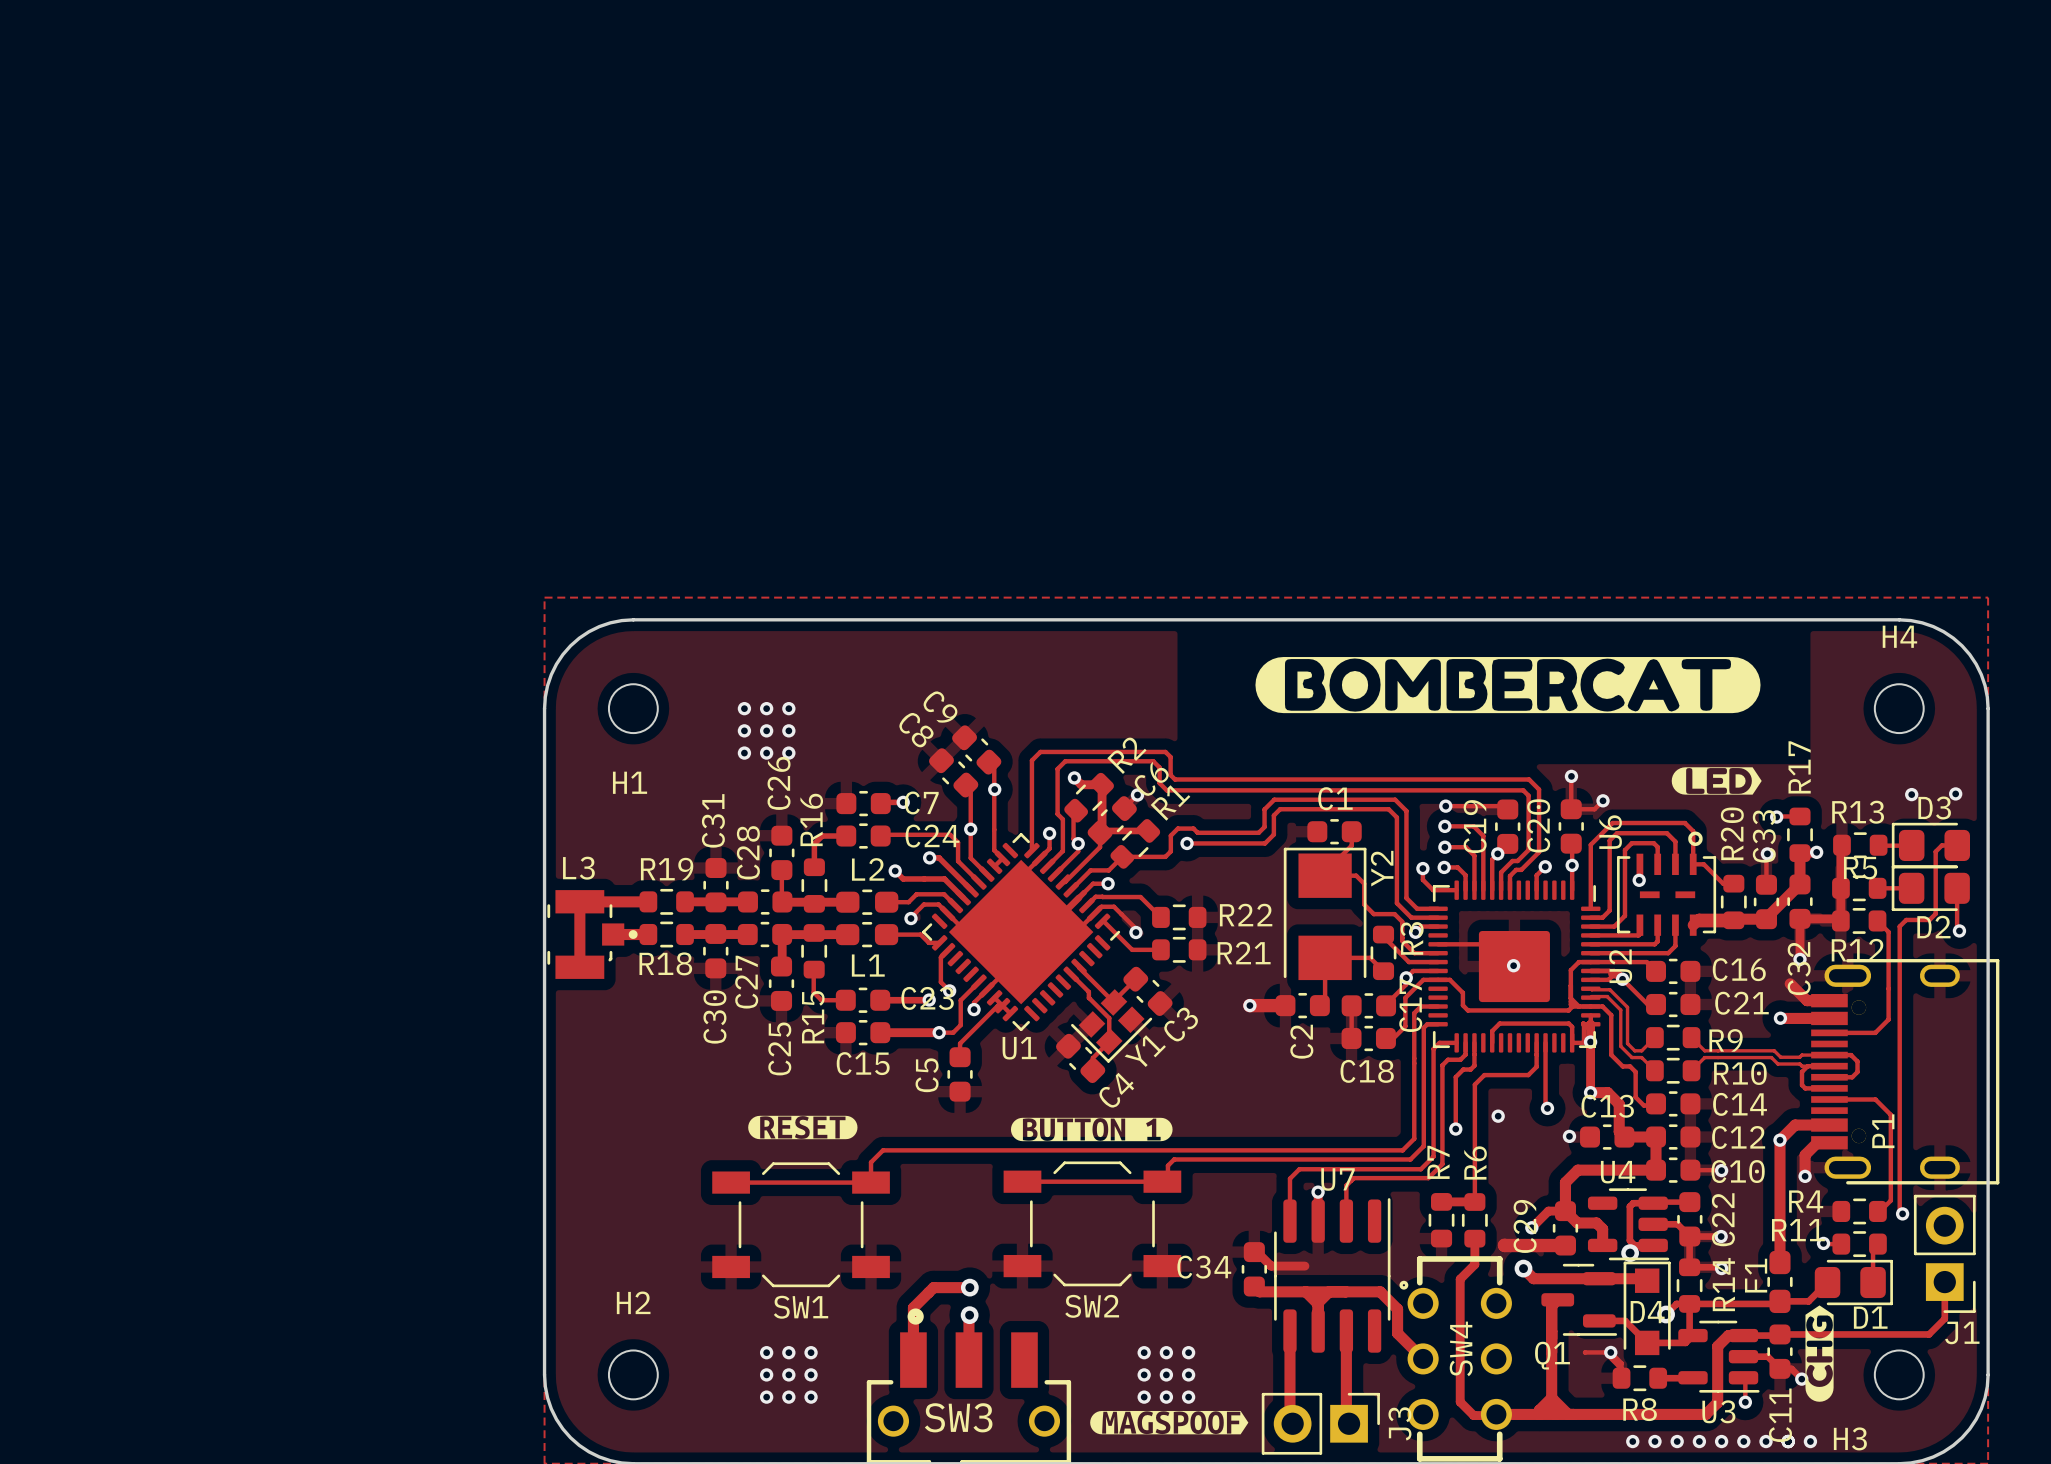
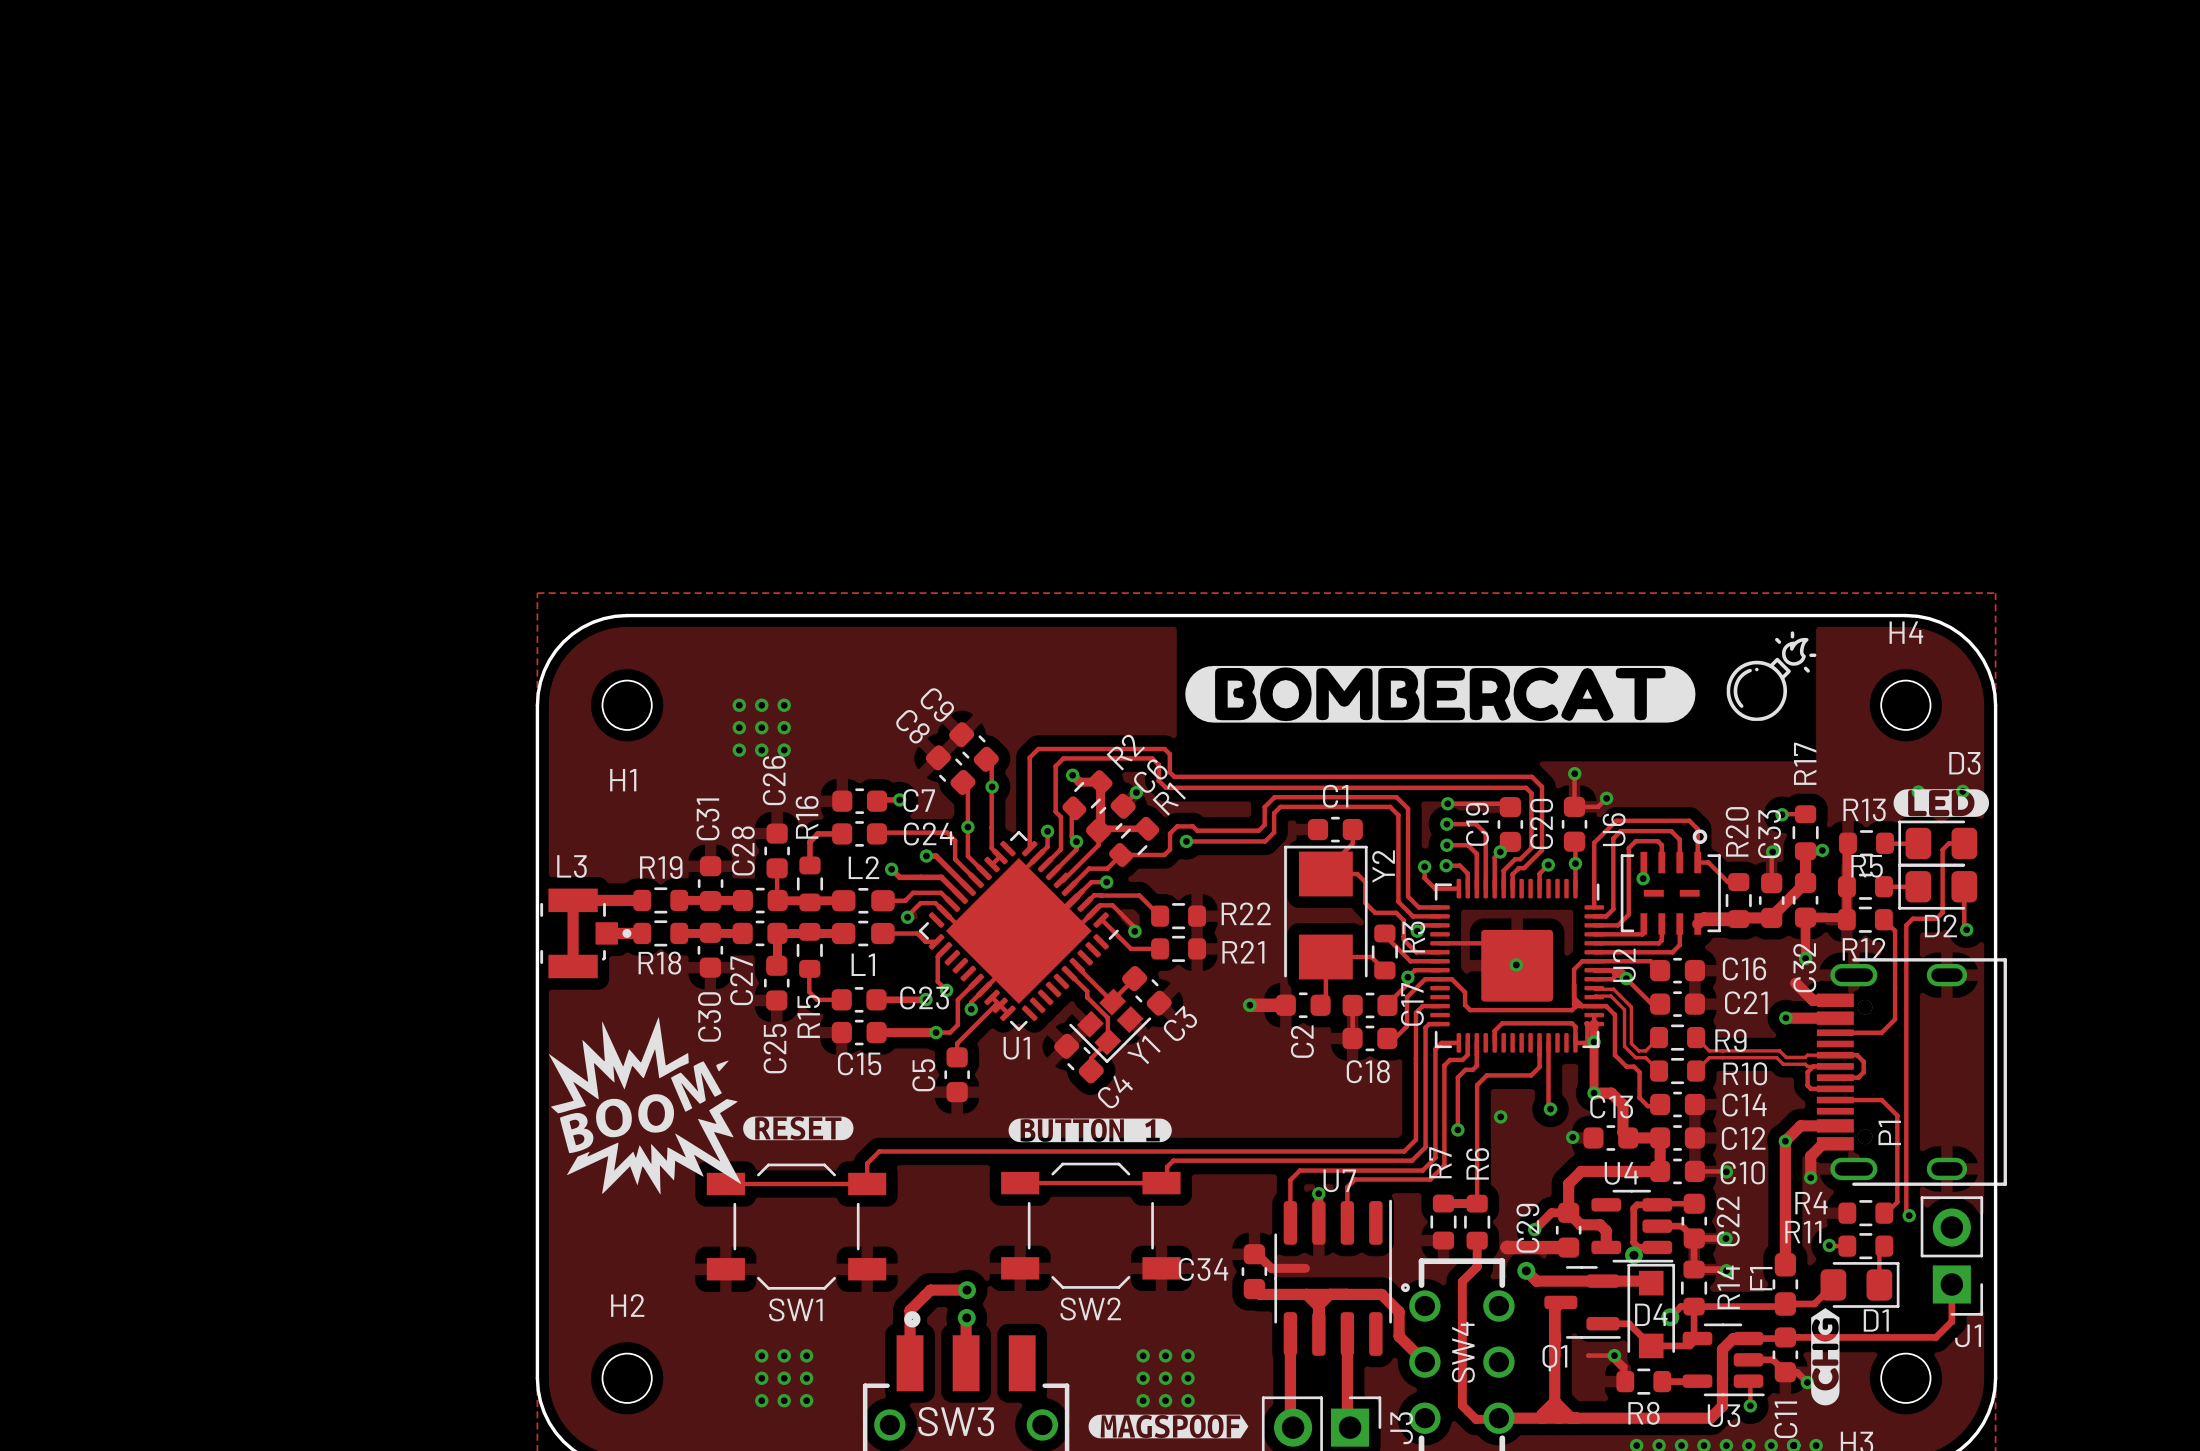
drawing: none -> [1726, 631, 1817, 721]
drawing position: (1508, 685) -> (1440, 694)
drawing: [1671, 767, 1762, 795] -> none
drawing: none -> [1893, 789, 1990, 817]
D3 name position: D3 (1934, 807) -> D3 (1964, 763)
drawing: none -> [548, 1017, 742, 1195]

